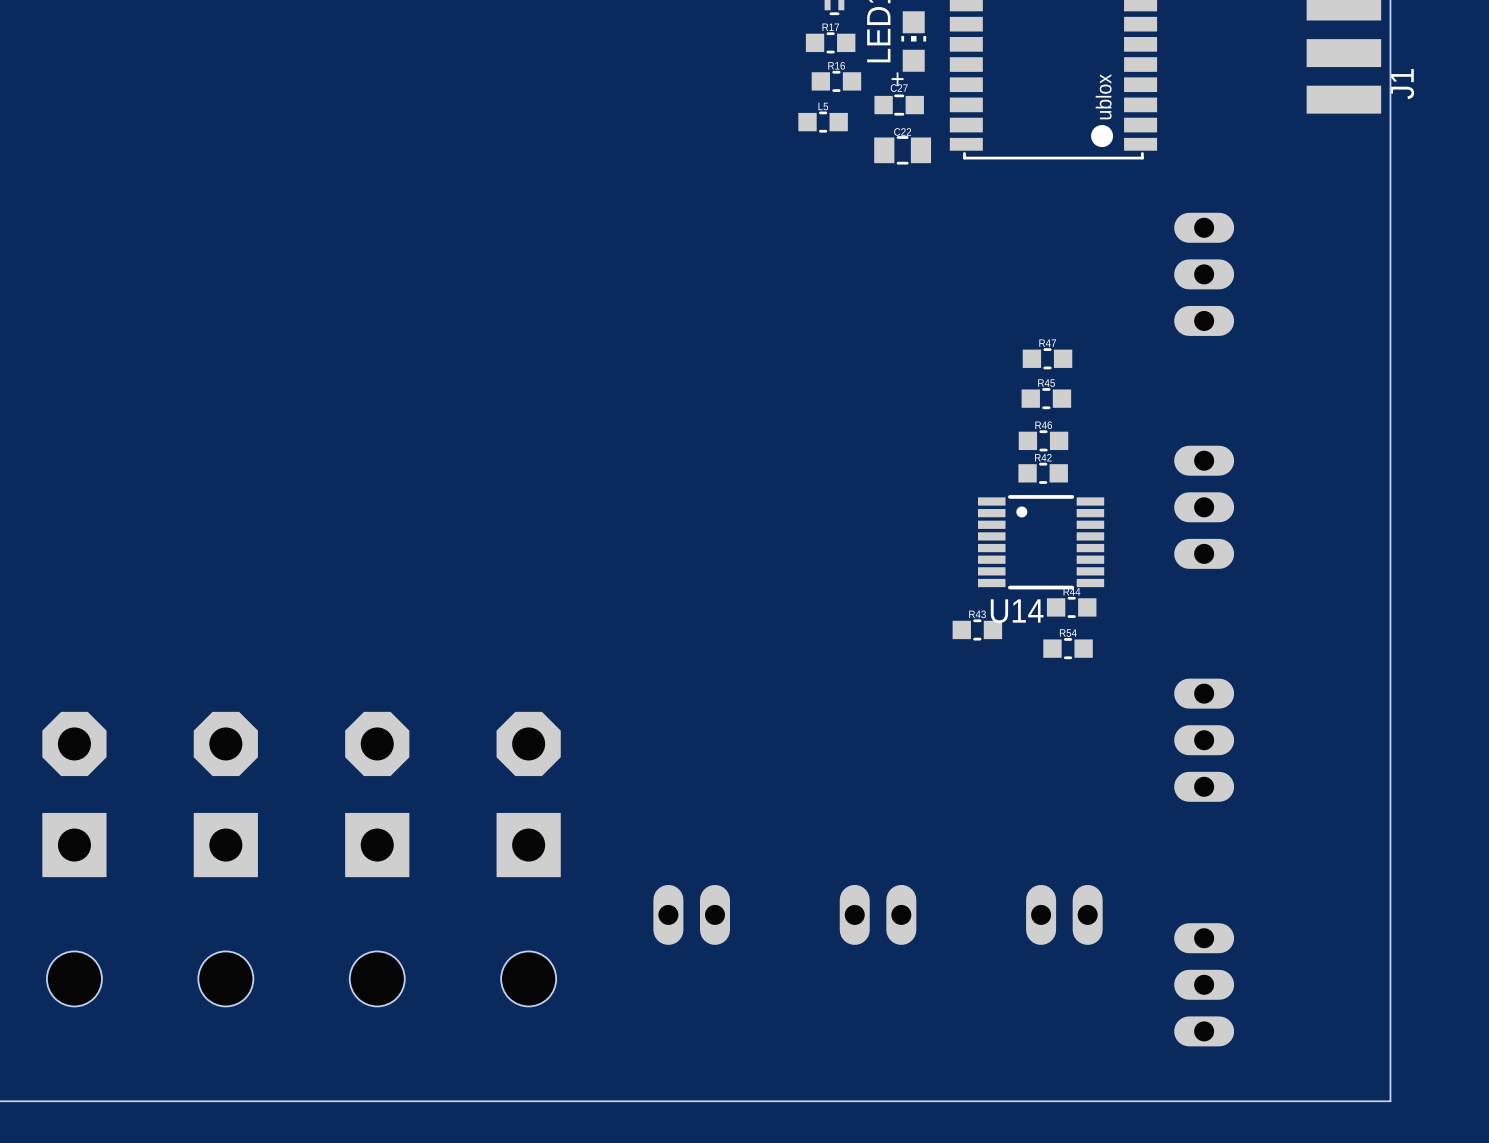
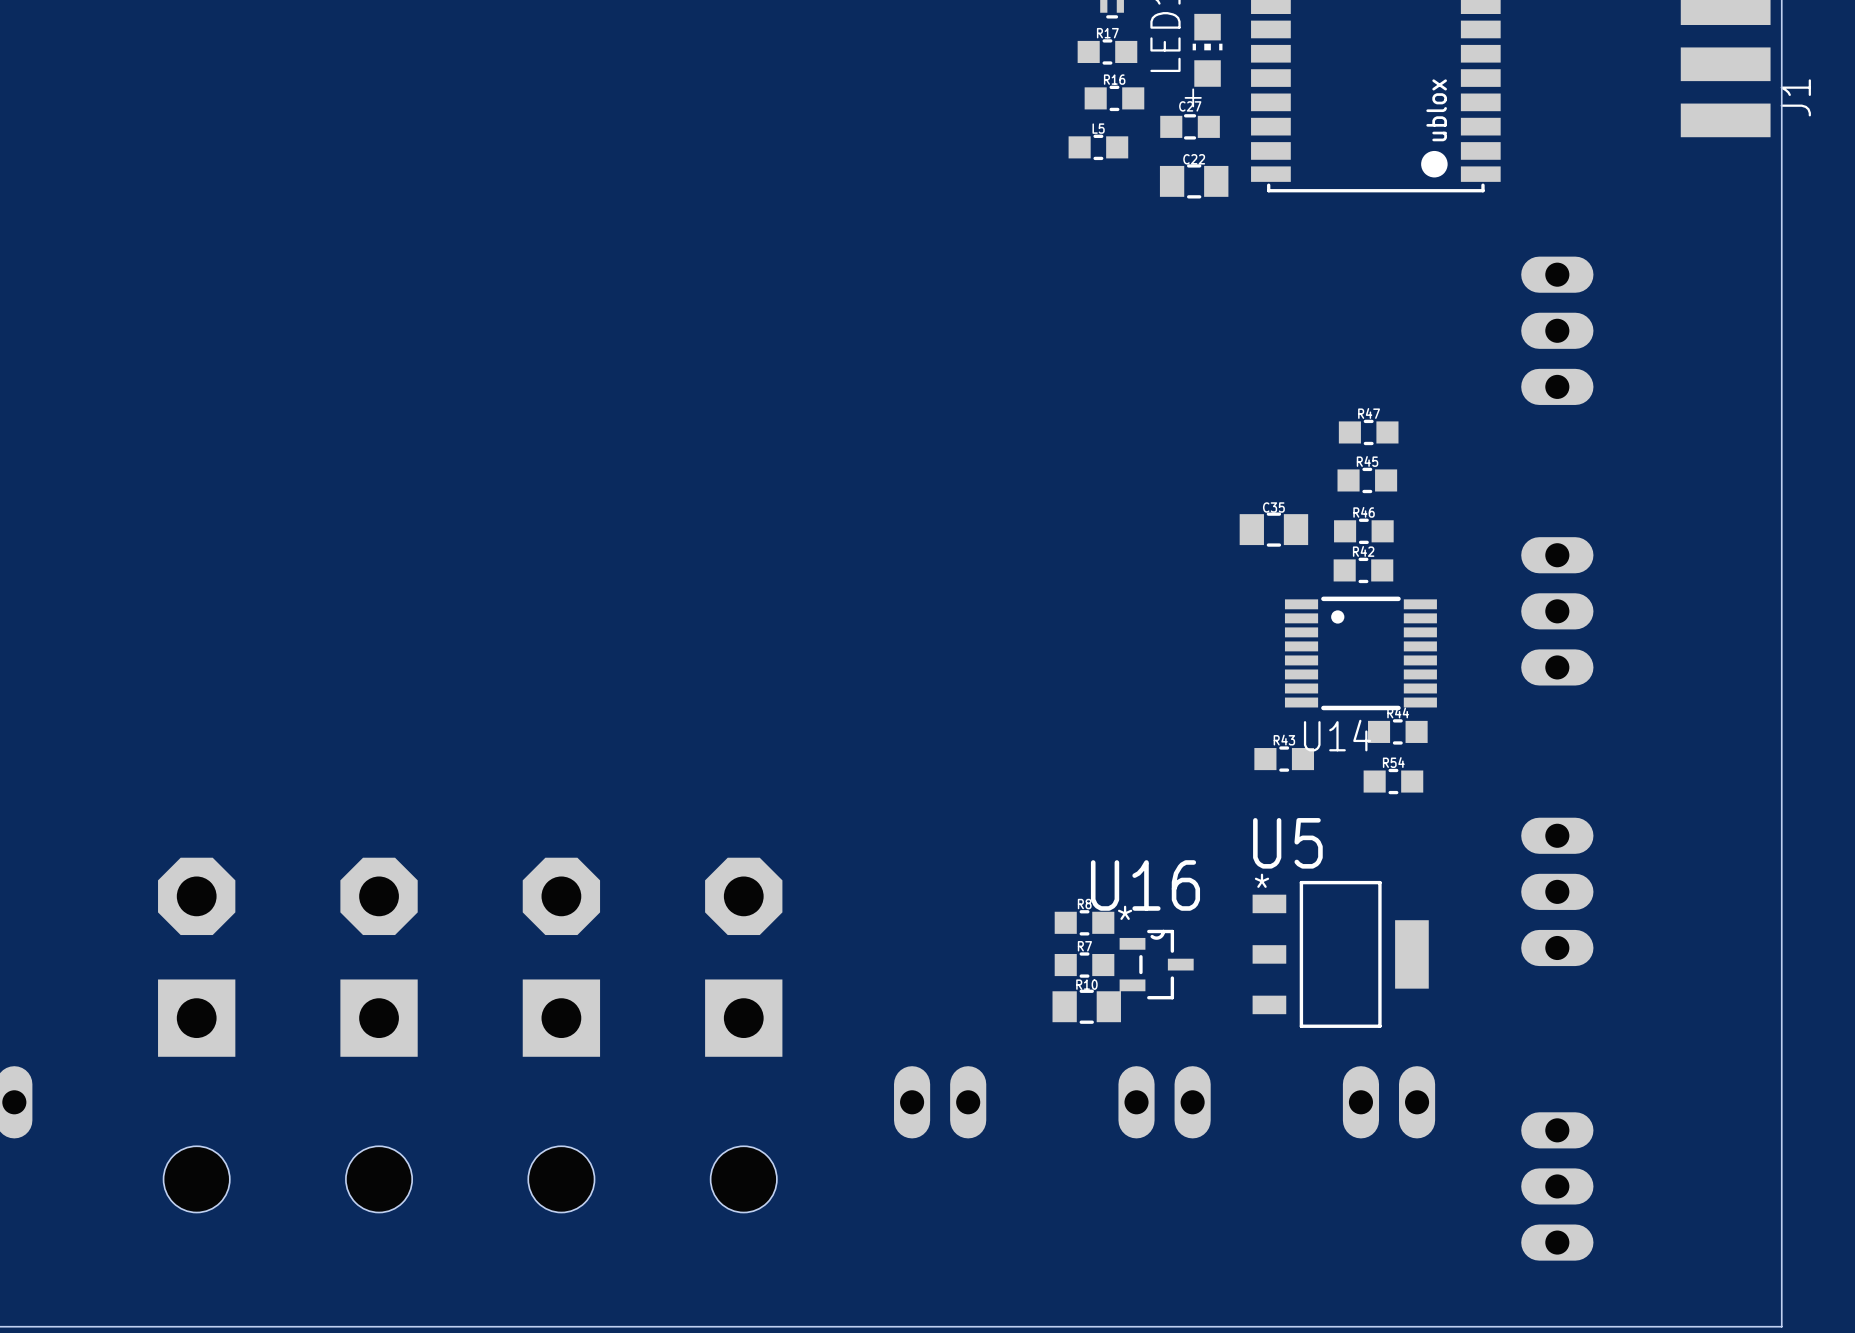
C35: none -> (1273, 529)
R8: none -> (1084, 922)
U5: none -> (1340, 954)
R7: none -> (1084, 965)
U16: none -> (1156, 964)
R10: none -> (1086, 1006)

